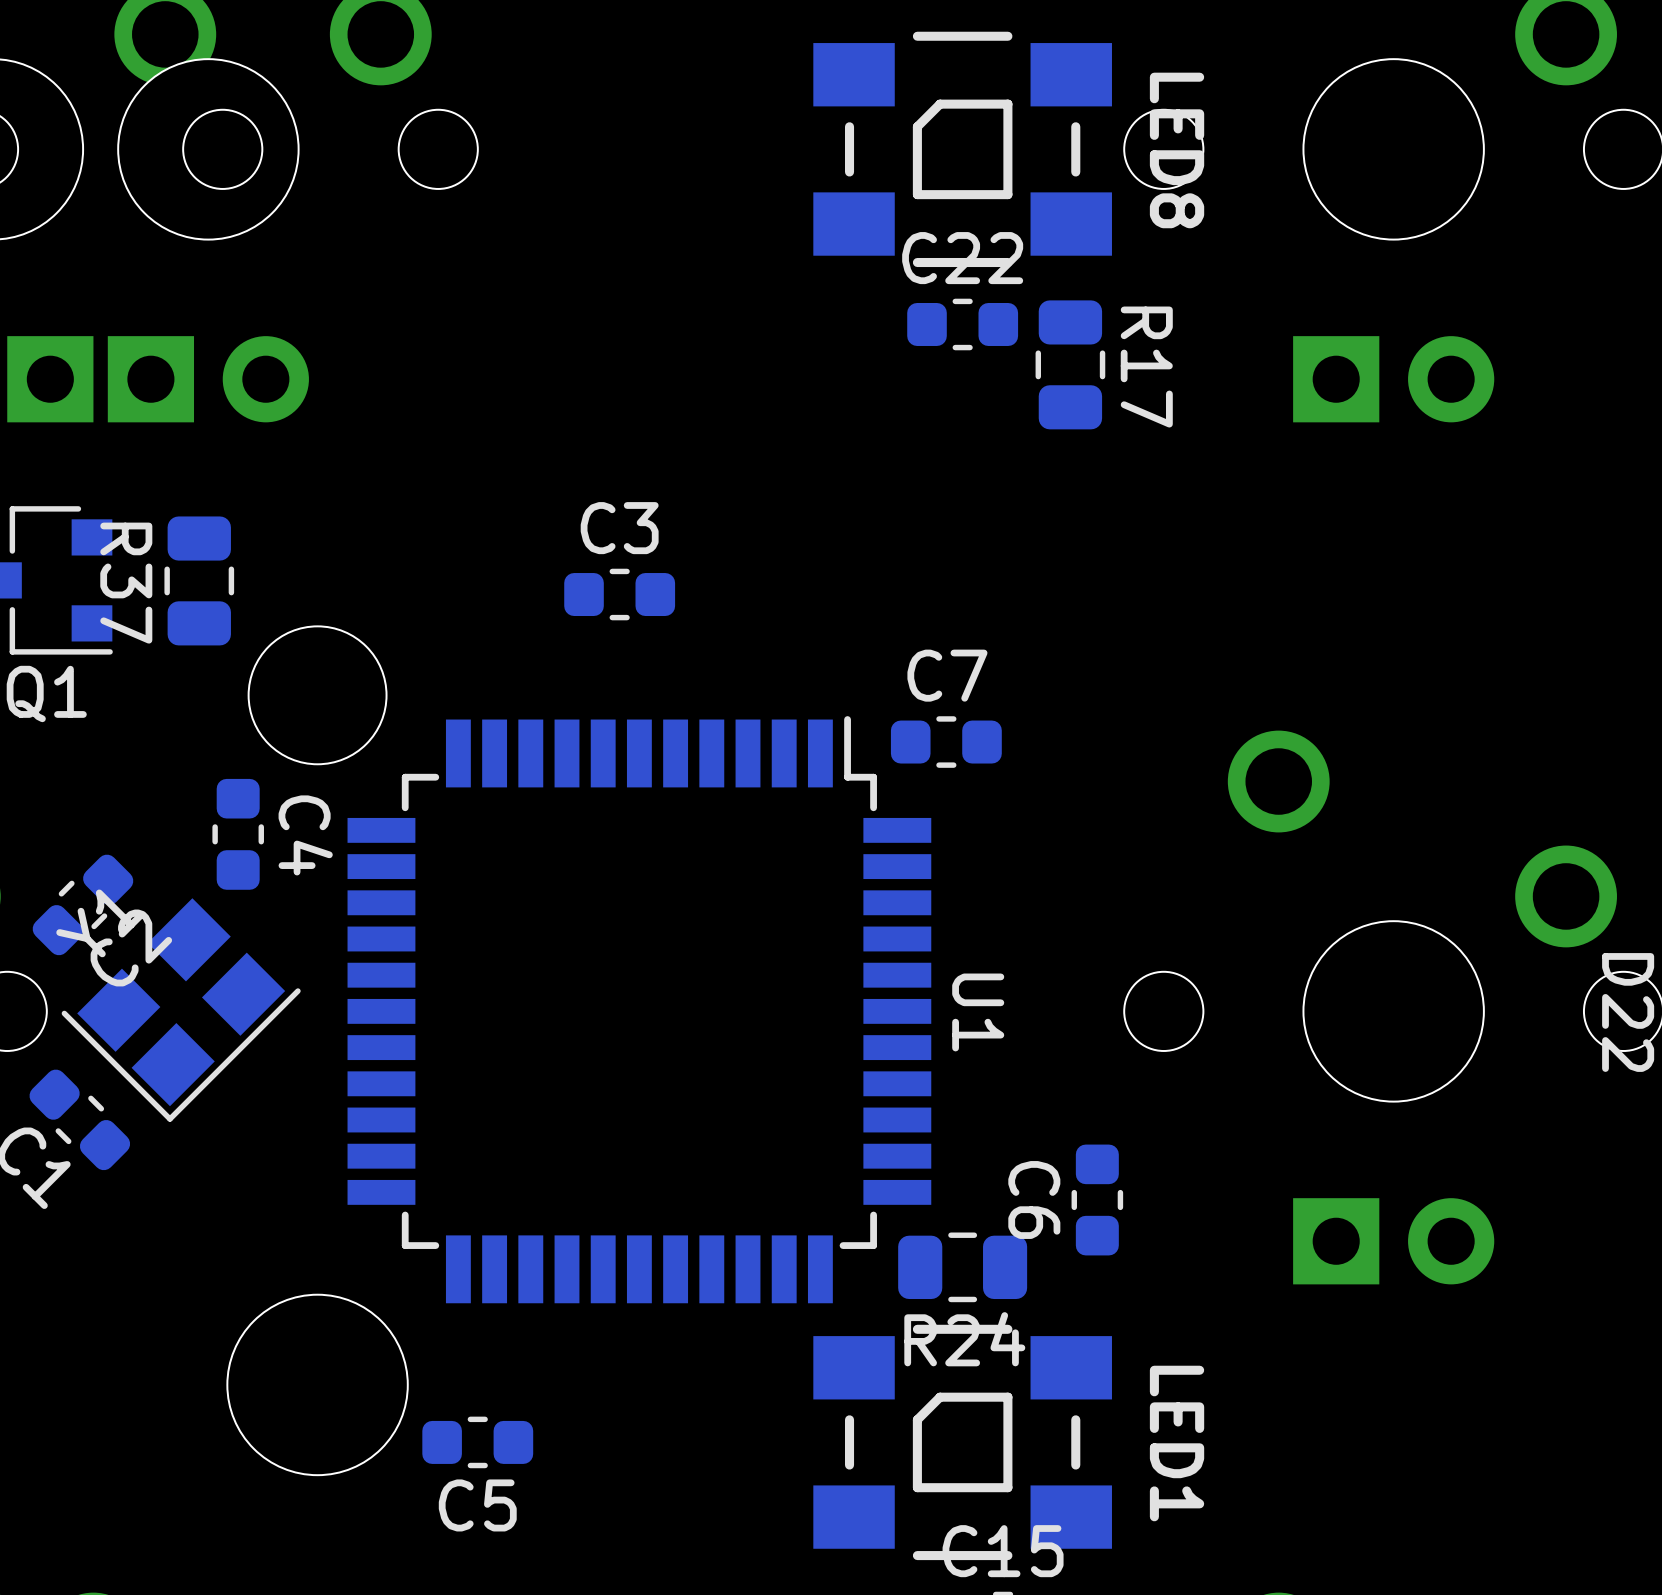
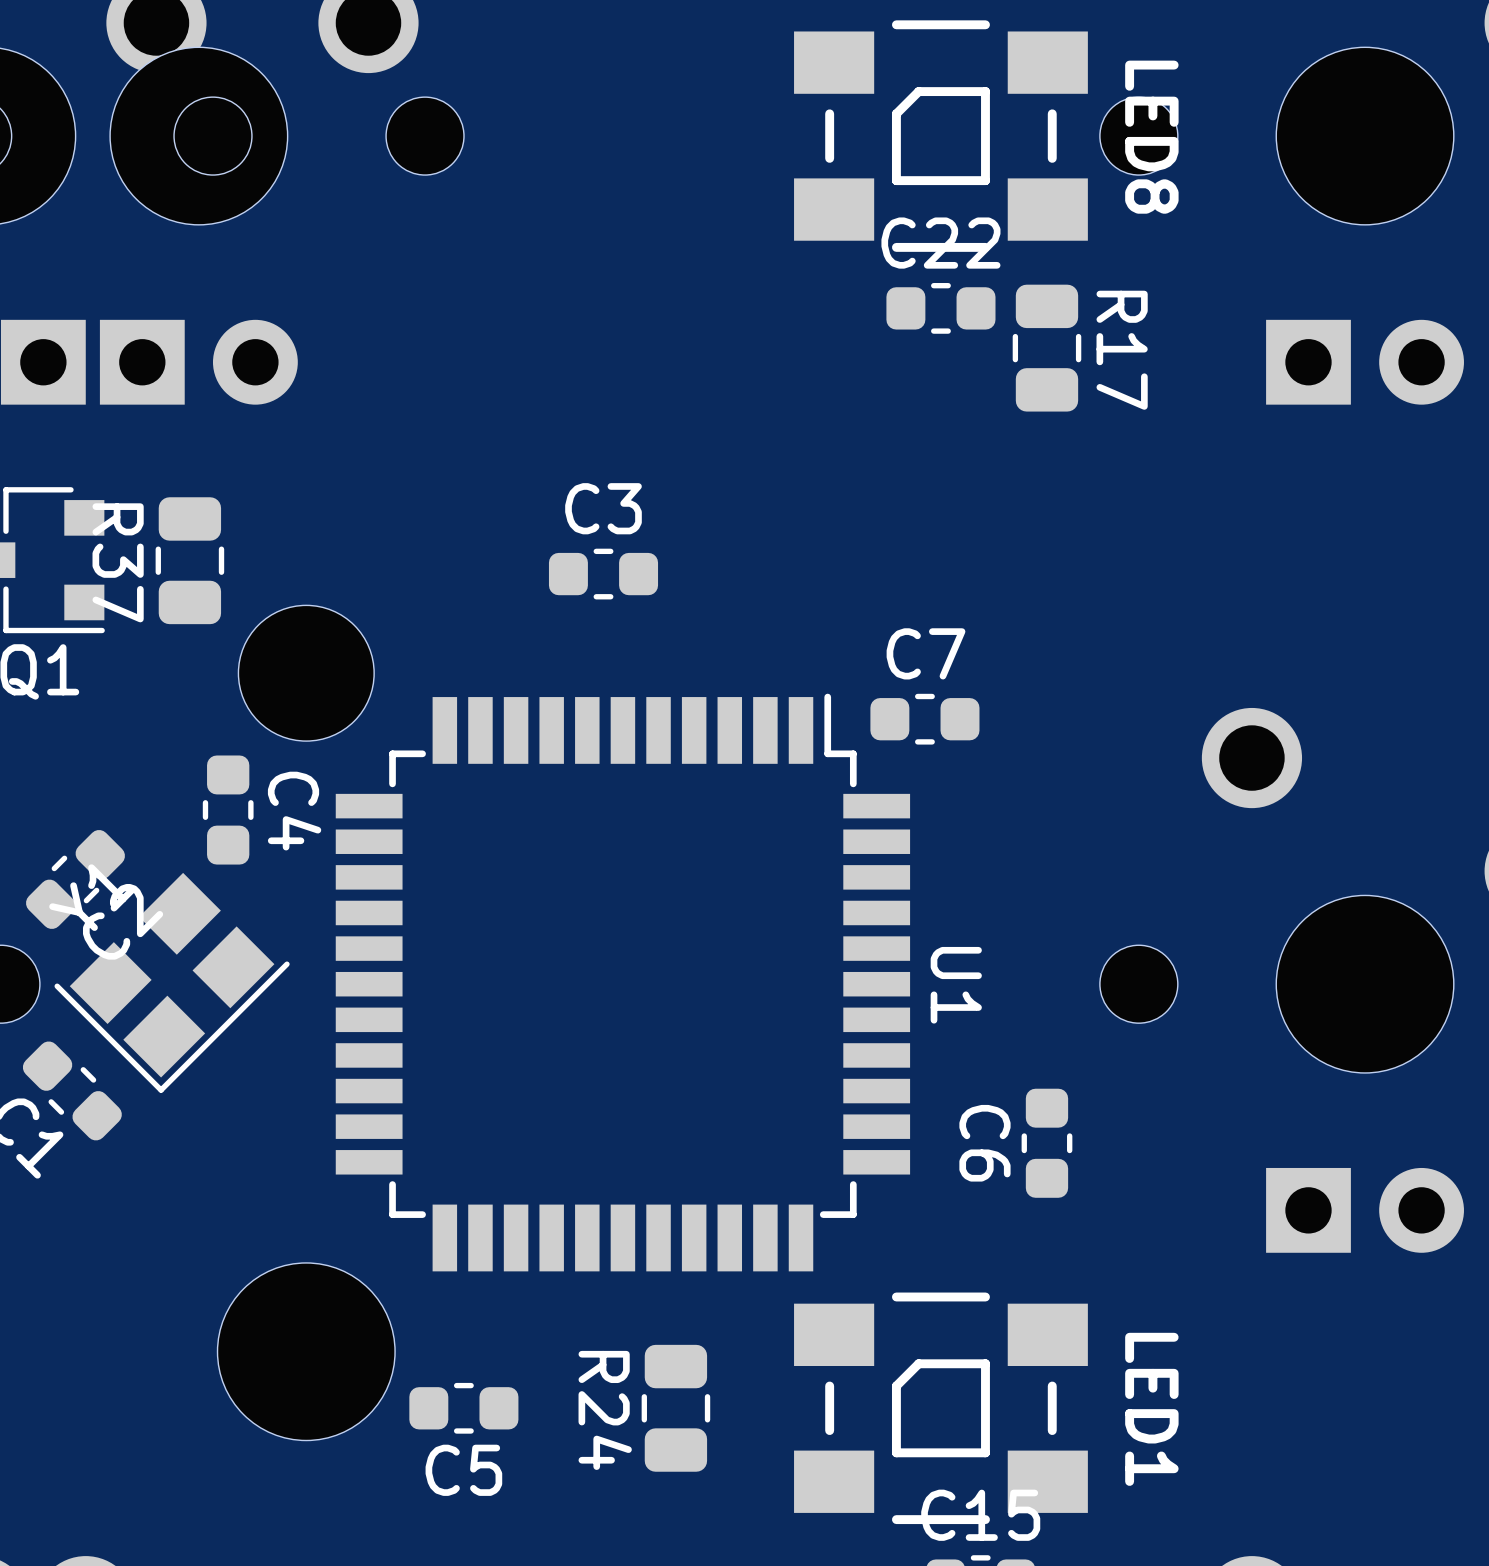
C6 position: (1097, 1200) -> (1046, 1143)
R24 rotation: 0° (962, 1267) -> 90° clockwise (675, 1408)
R24 position: (962, 1267) -> (675, 1408)

